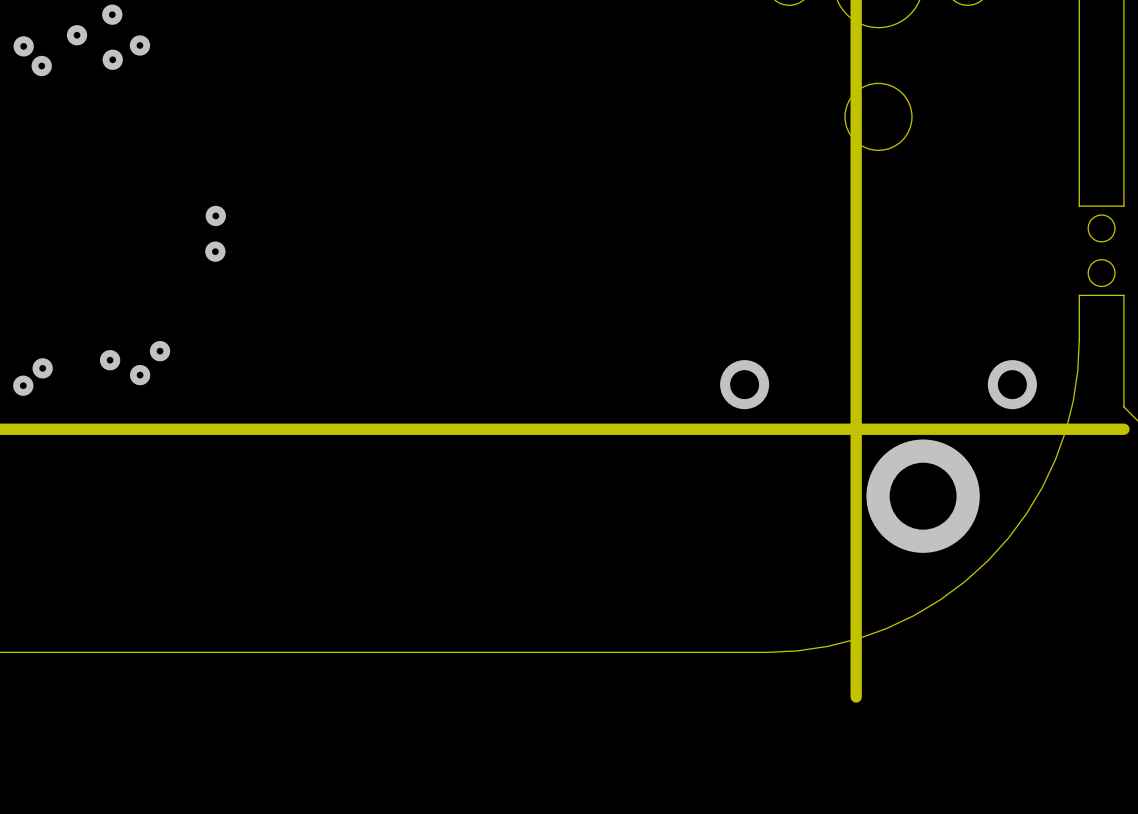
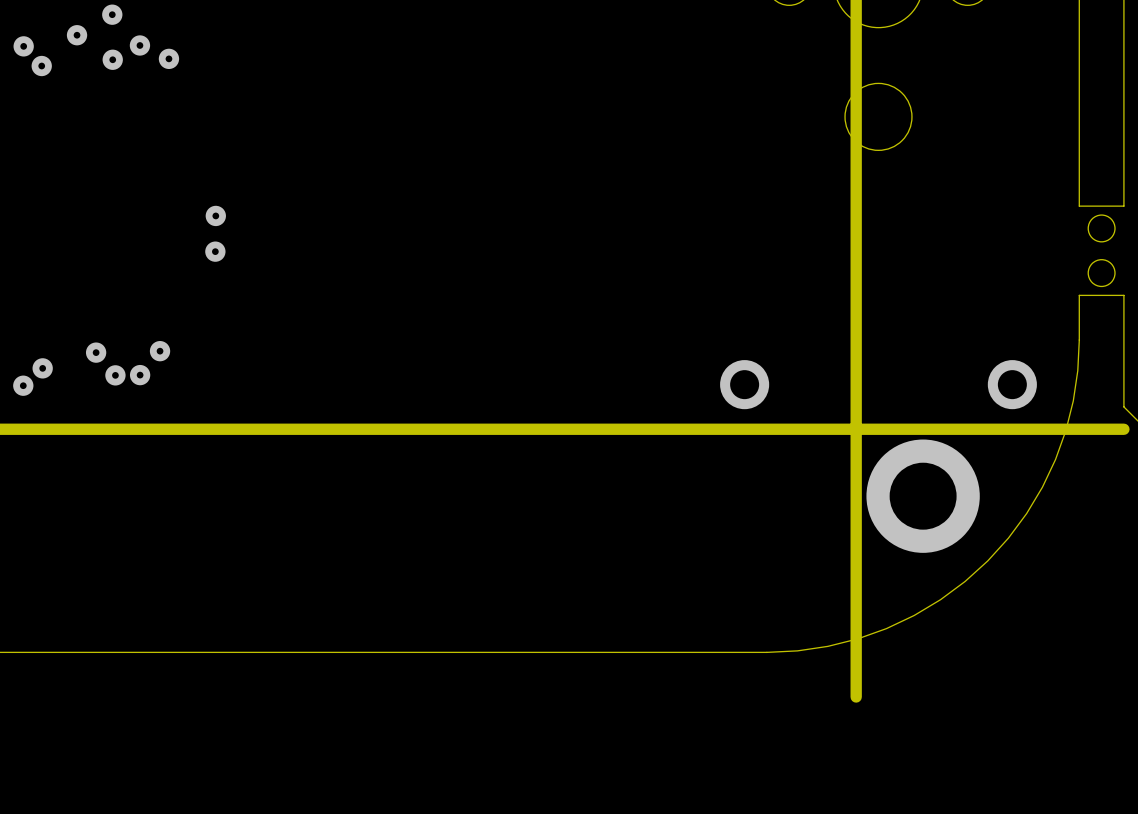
via: none -> (168, 58)
via: none -> (96, 352)
via: (110, 360) -> none
via: none -> (115, 375)

